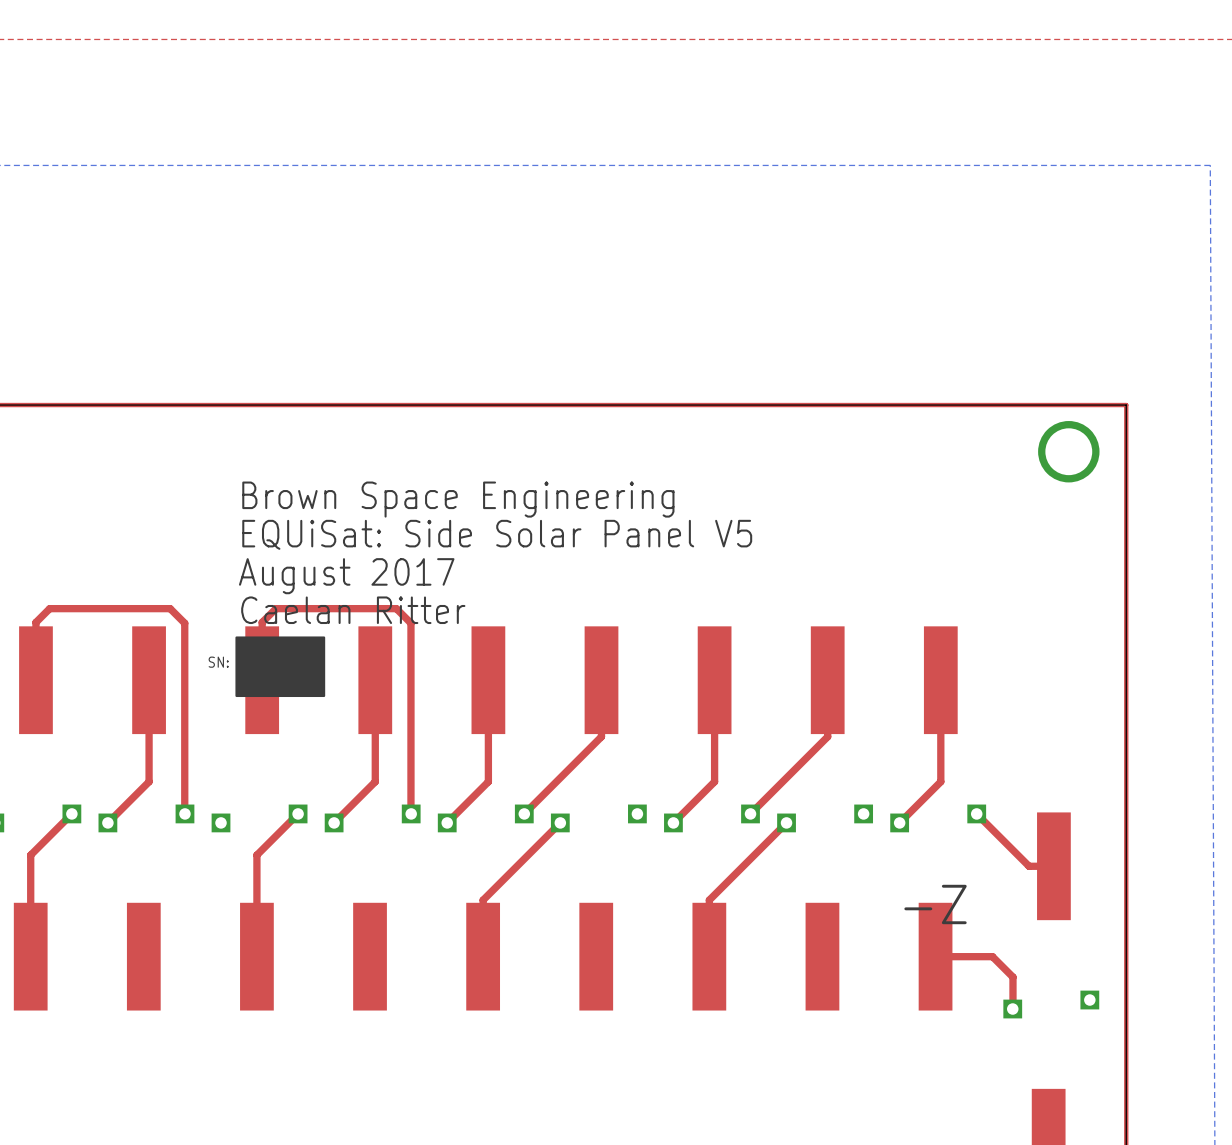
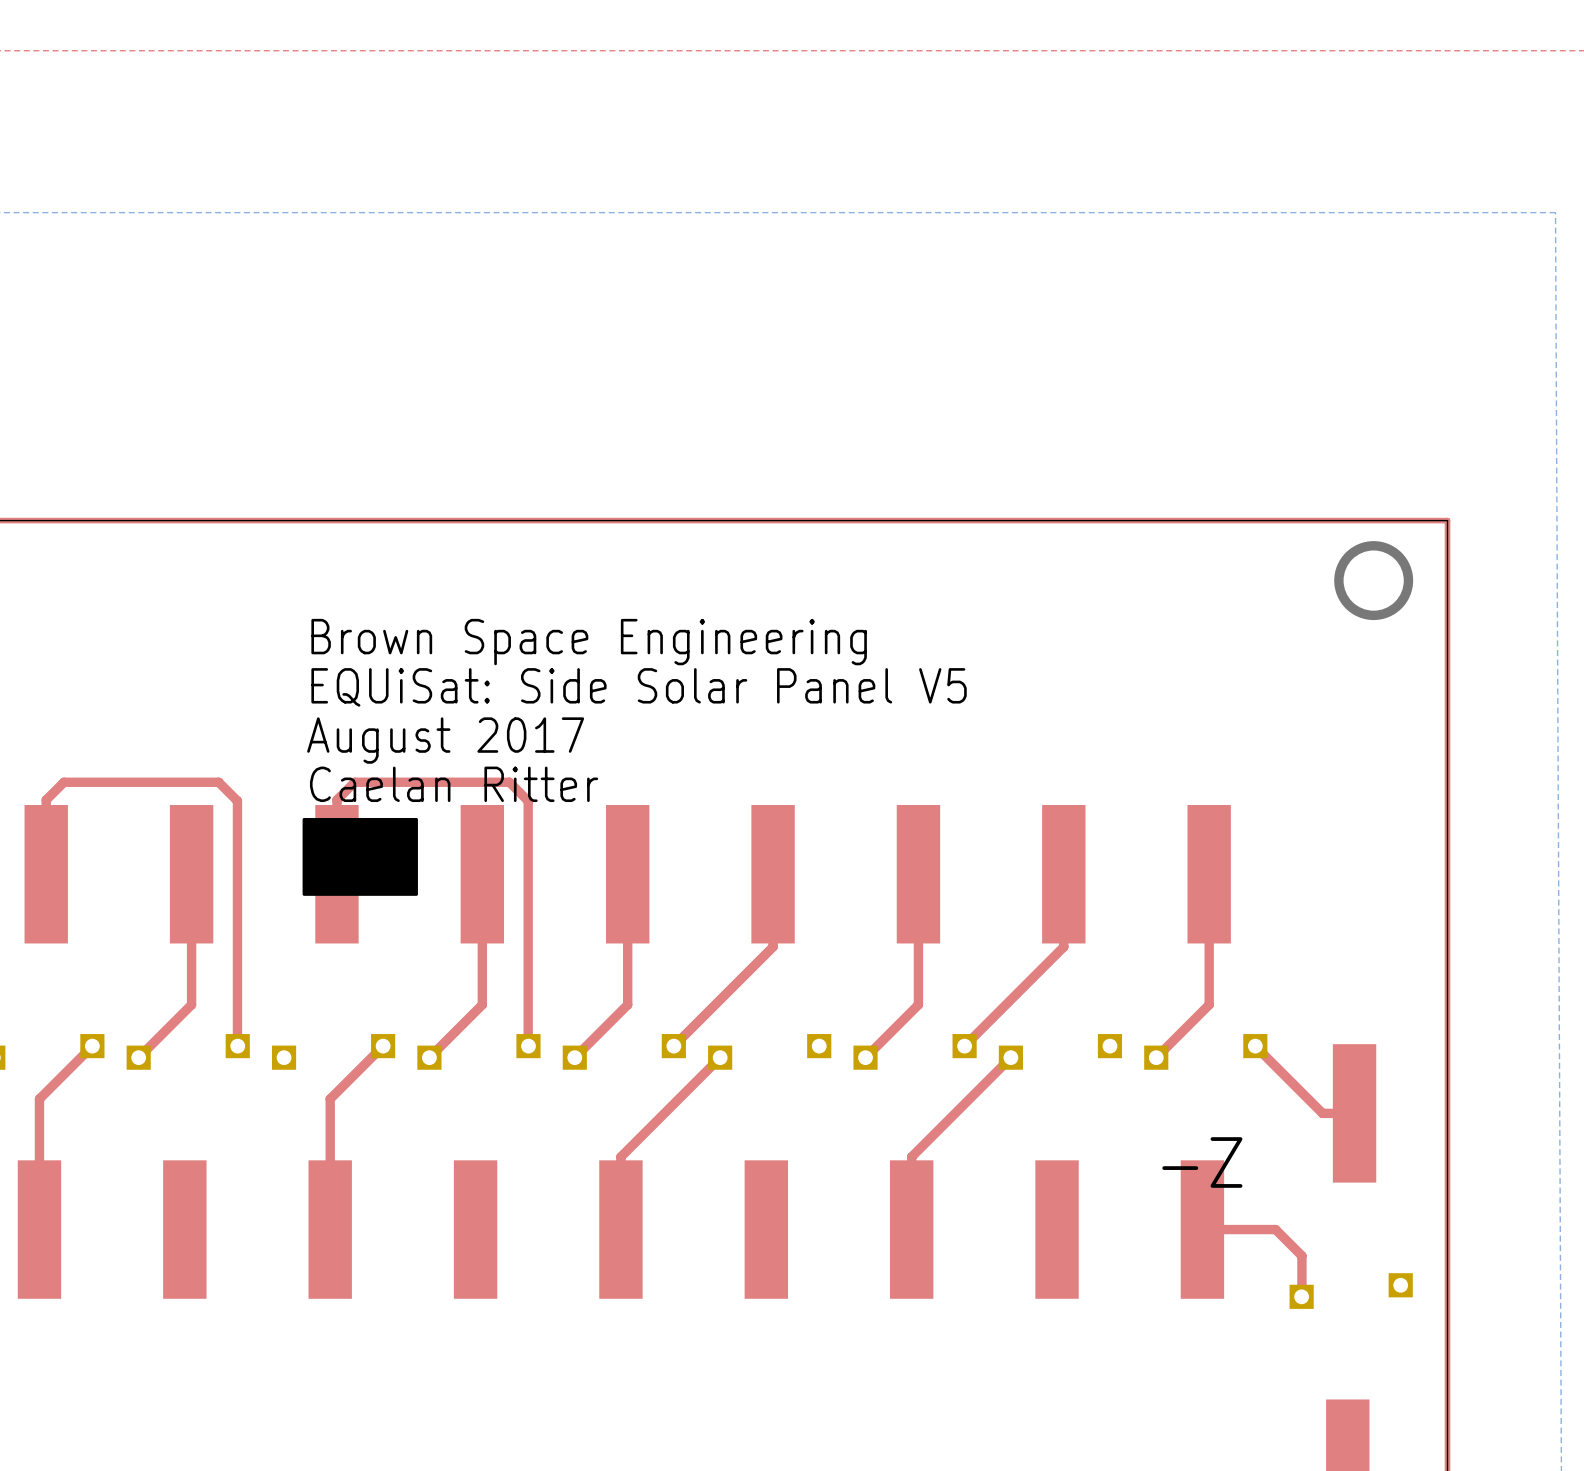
text: SN: (218, 662) -> none

